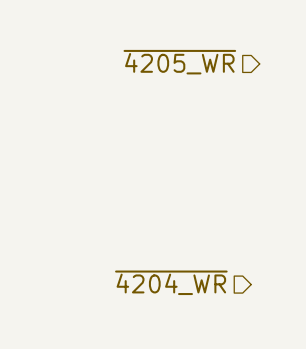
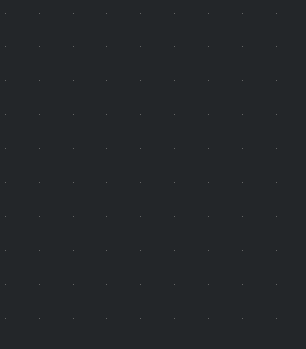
hierarchical label: ~{4205_WR} (179, 62) -> none
hierarchical label: ~{4204_WR} (171, 282) -> none

